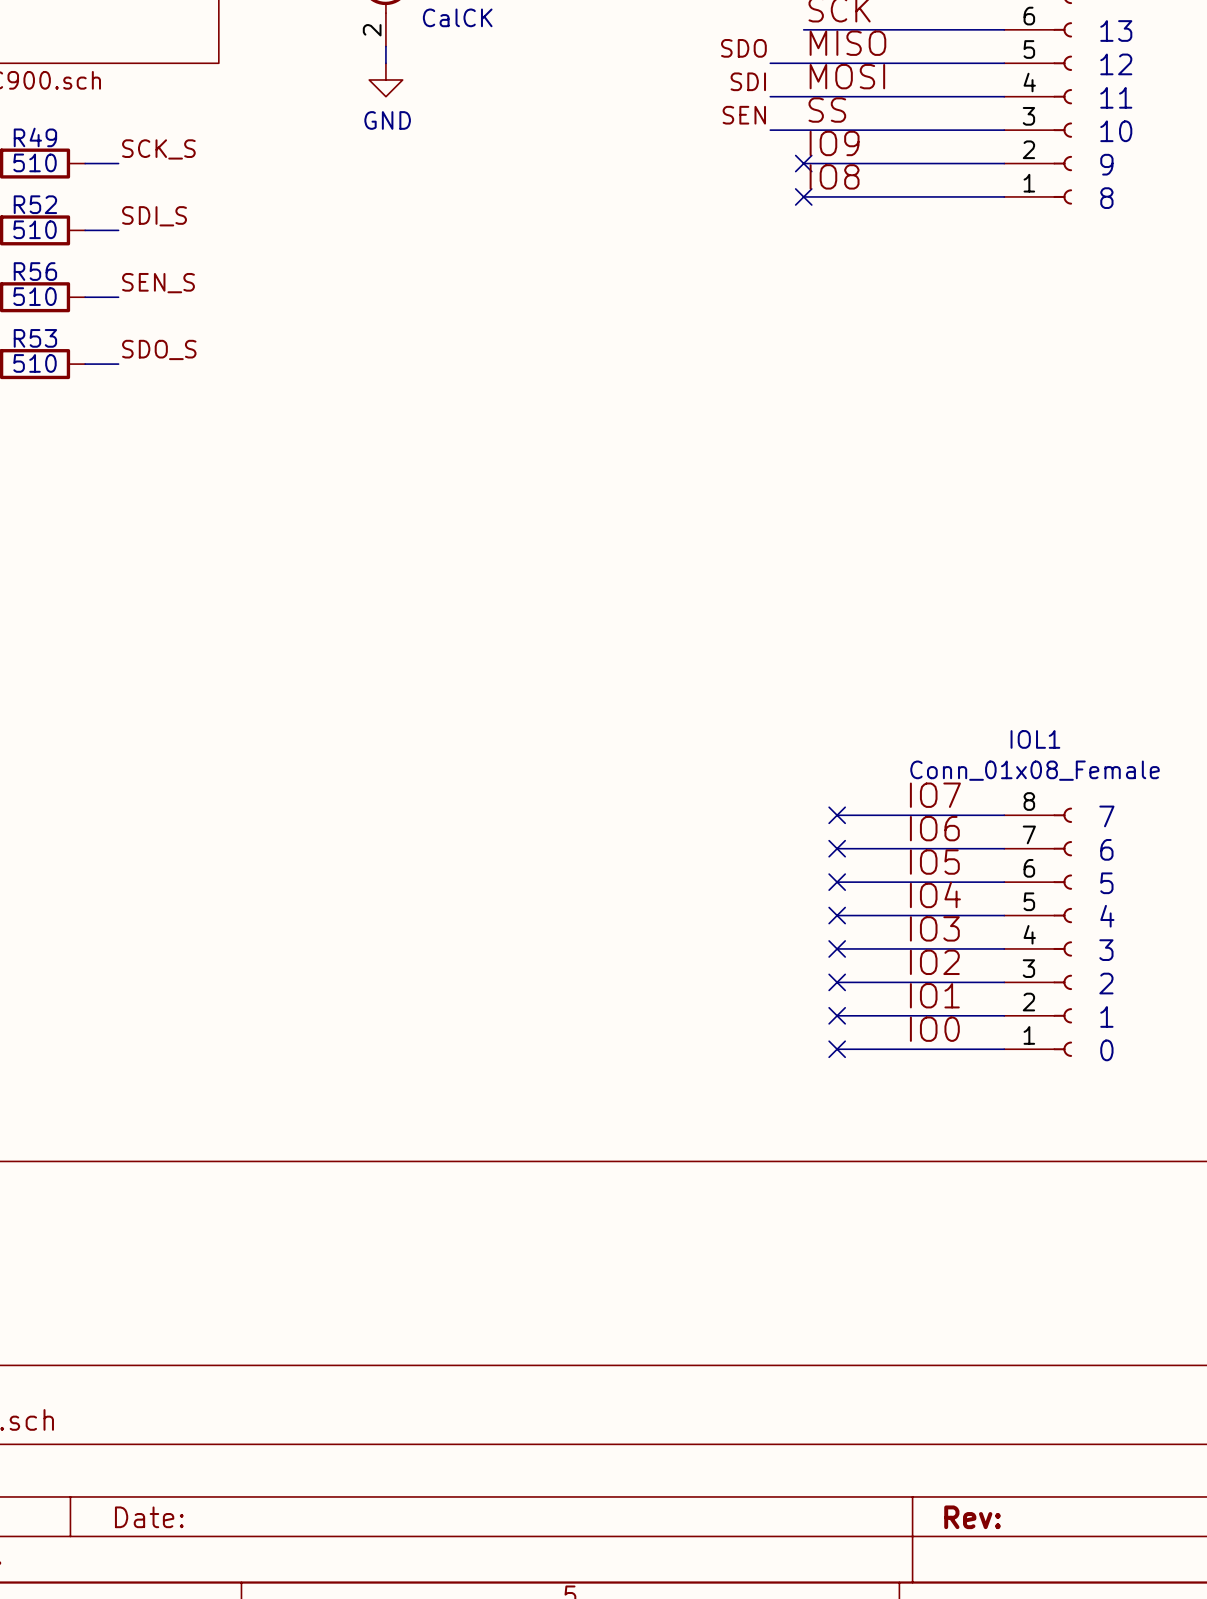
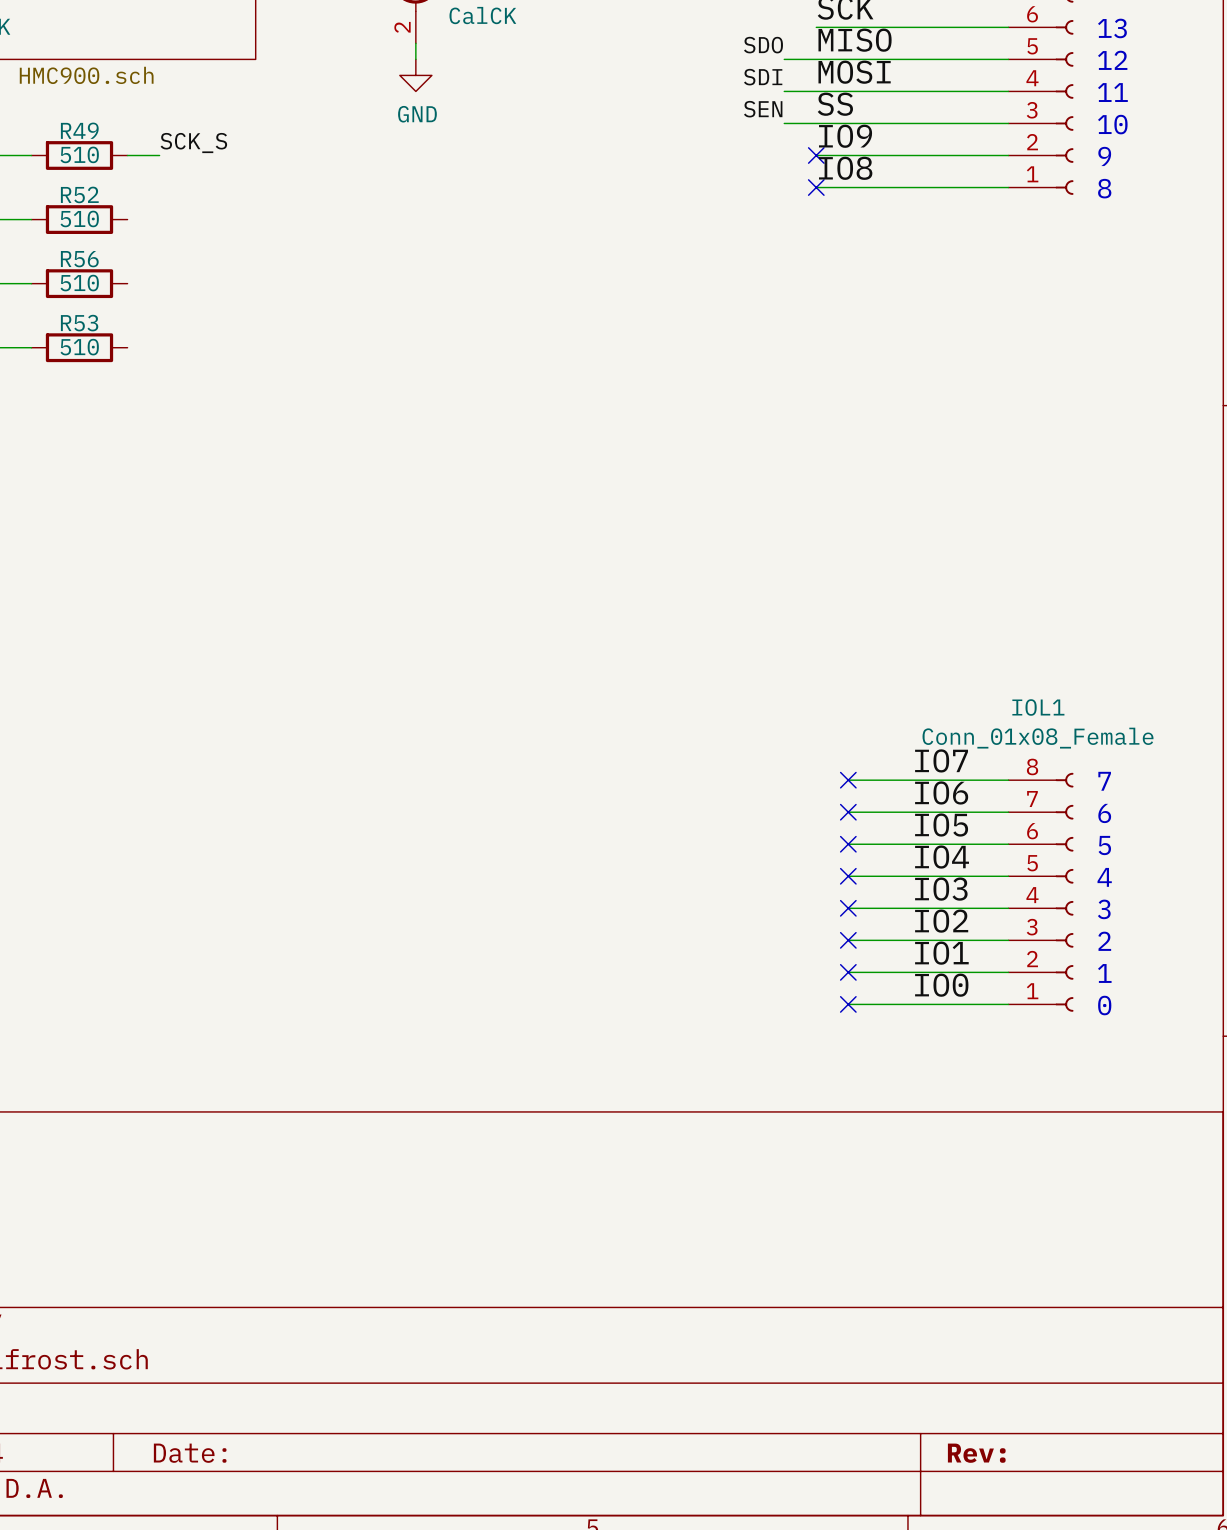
label: SDI_S (154, 216) -> none
wire: (85, 230) (118, 230) -> none
label: SEN_S (158, 283) -> none
wire: (85, 297) (118, 297) -> none
label: SDO_S (159, 349) -> none
wire: (85, 364) (118, 364) -> none

